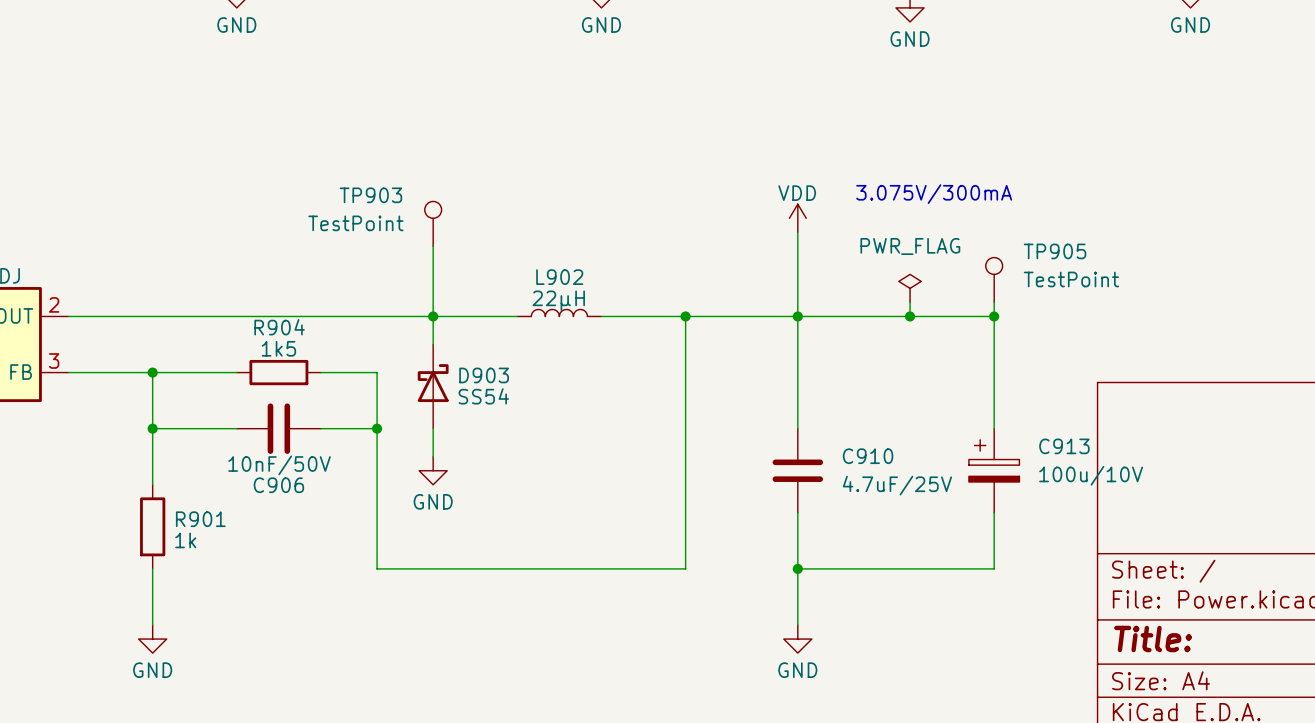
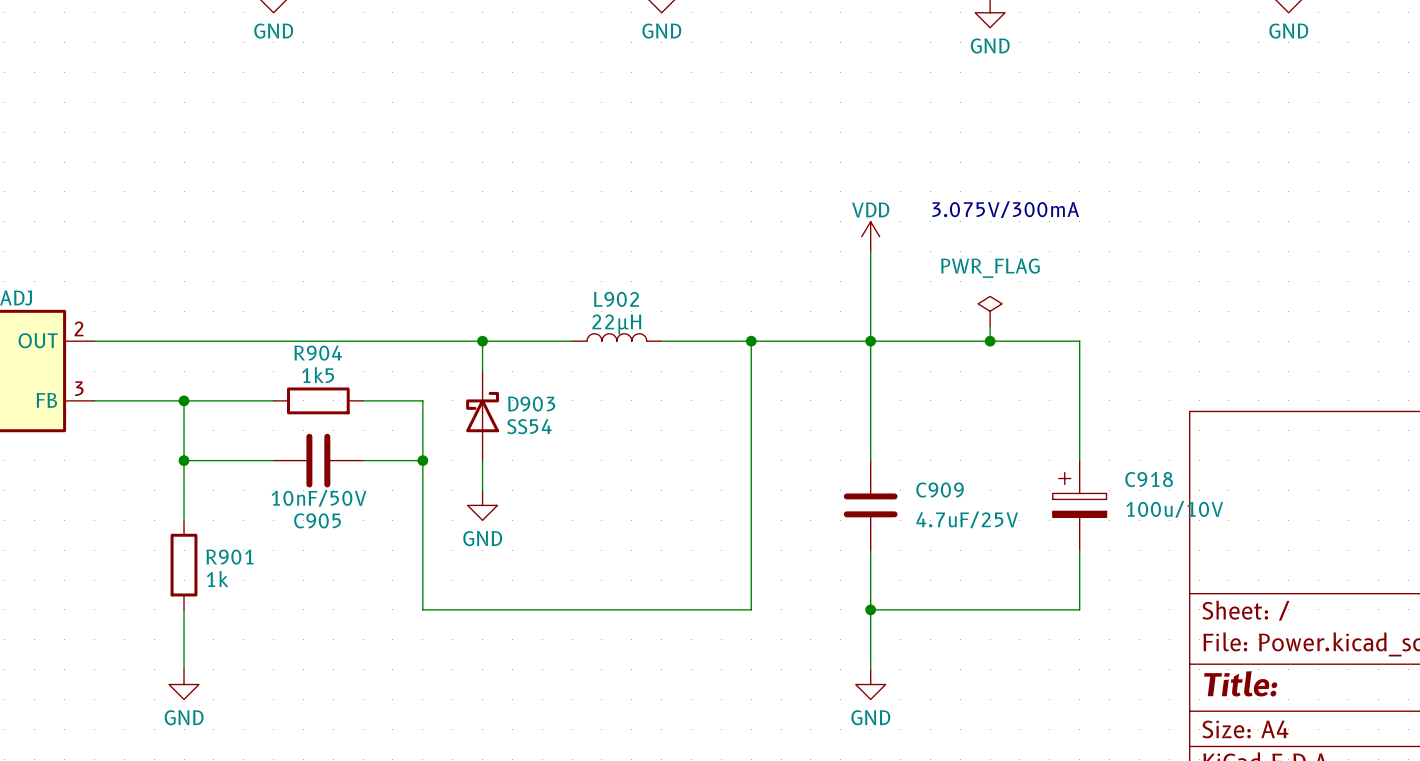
TP903: TestPoint (433, 223) -> none
wire: (433, 246) (433, 316) -> none
TP905: TestPoint (994, 280) -> none
wire: (994, 302) (994, 316) -> none
junction: (994, 316) -> none
C913 name: C913 (1064, 446) -> C918 (1149, 479)
C910 name: C910 (868, 456) -> C909 (940, 490)
C906 name: C906 (278, 485) -> C905 (317, 520)

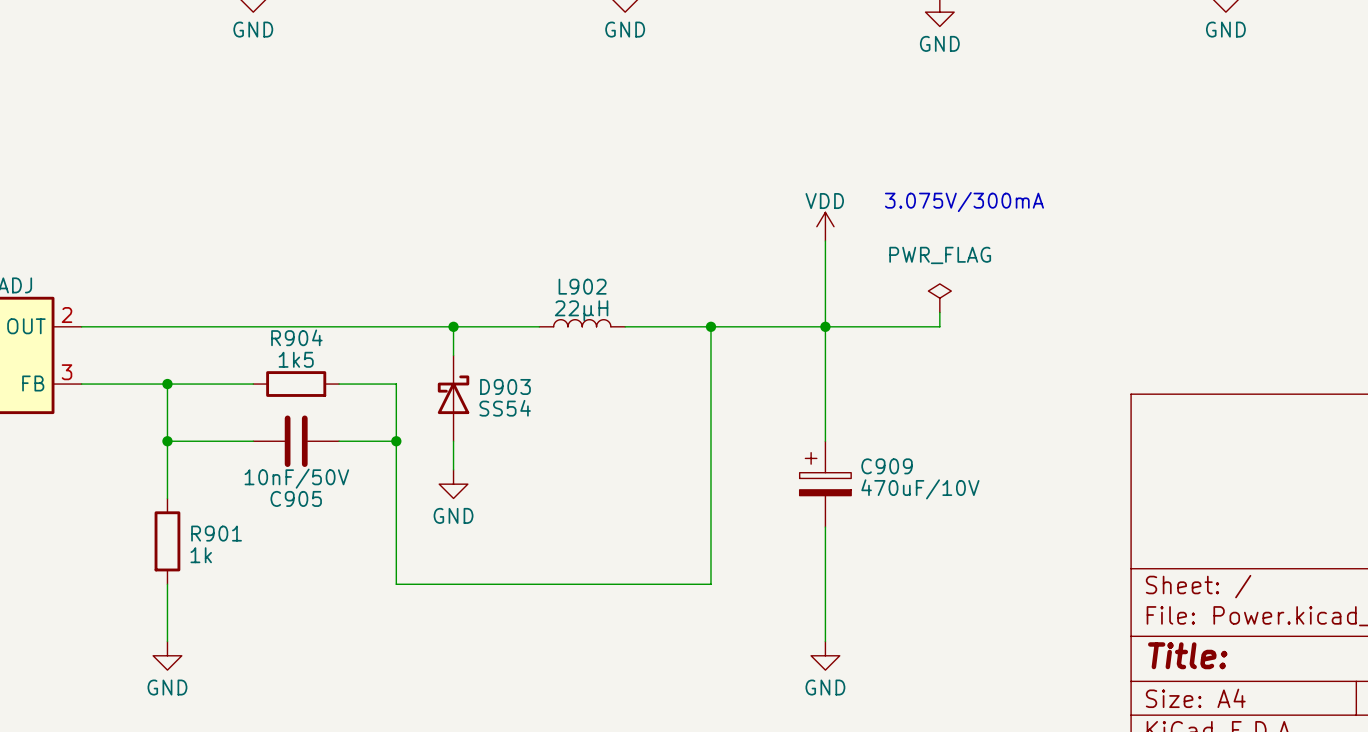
wire: (990, 341) (1079, 341) (1079, 460) -> none
junction: (990, 341) -> none
C909 symbol: [843, 460, 898, 551] -> [799, 441, 852, 528]
C918: 100u/10V (1079, 505) -> none
C909 value: 4.7uF/25V (967, 519) -> 470uF/10V (920, 489)
wire: (1079, 550) (1079, 609) (870, 609) -> none
junction: (870, 609) -> none

